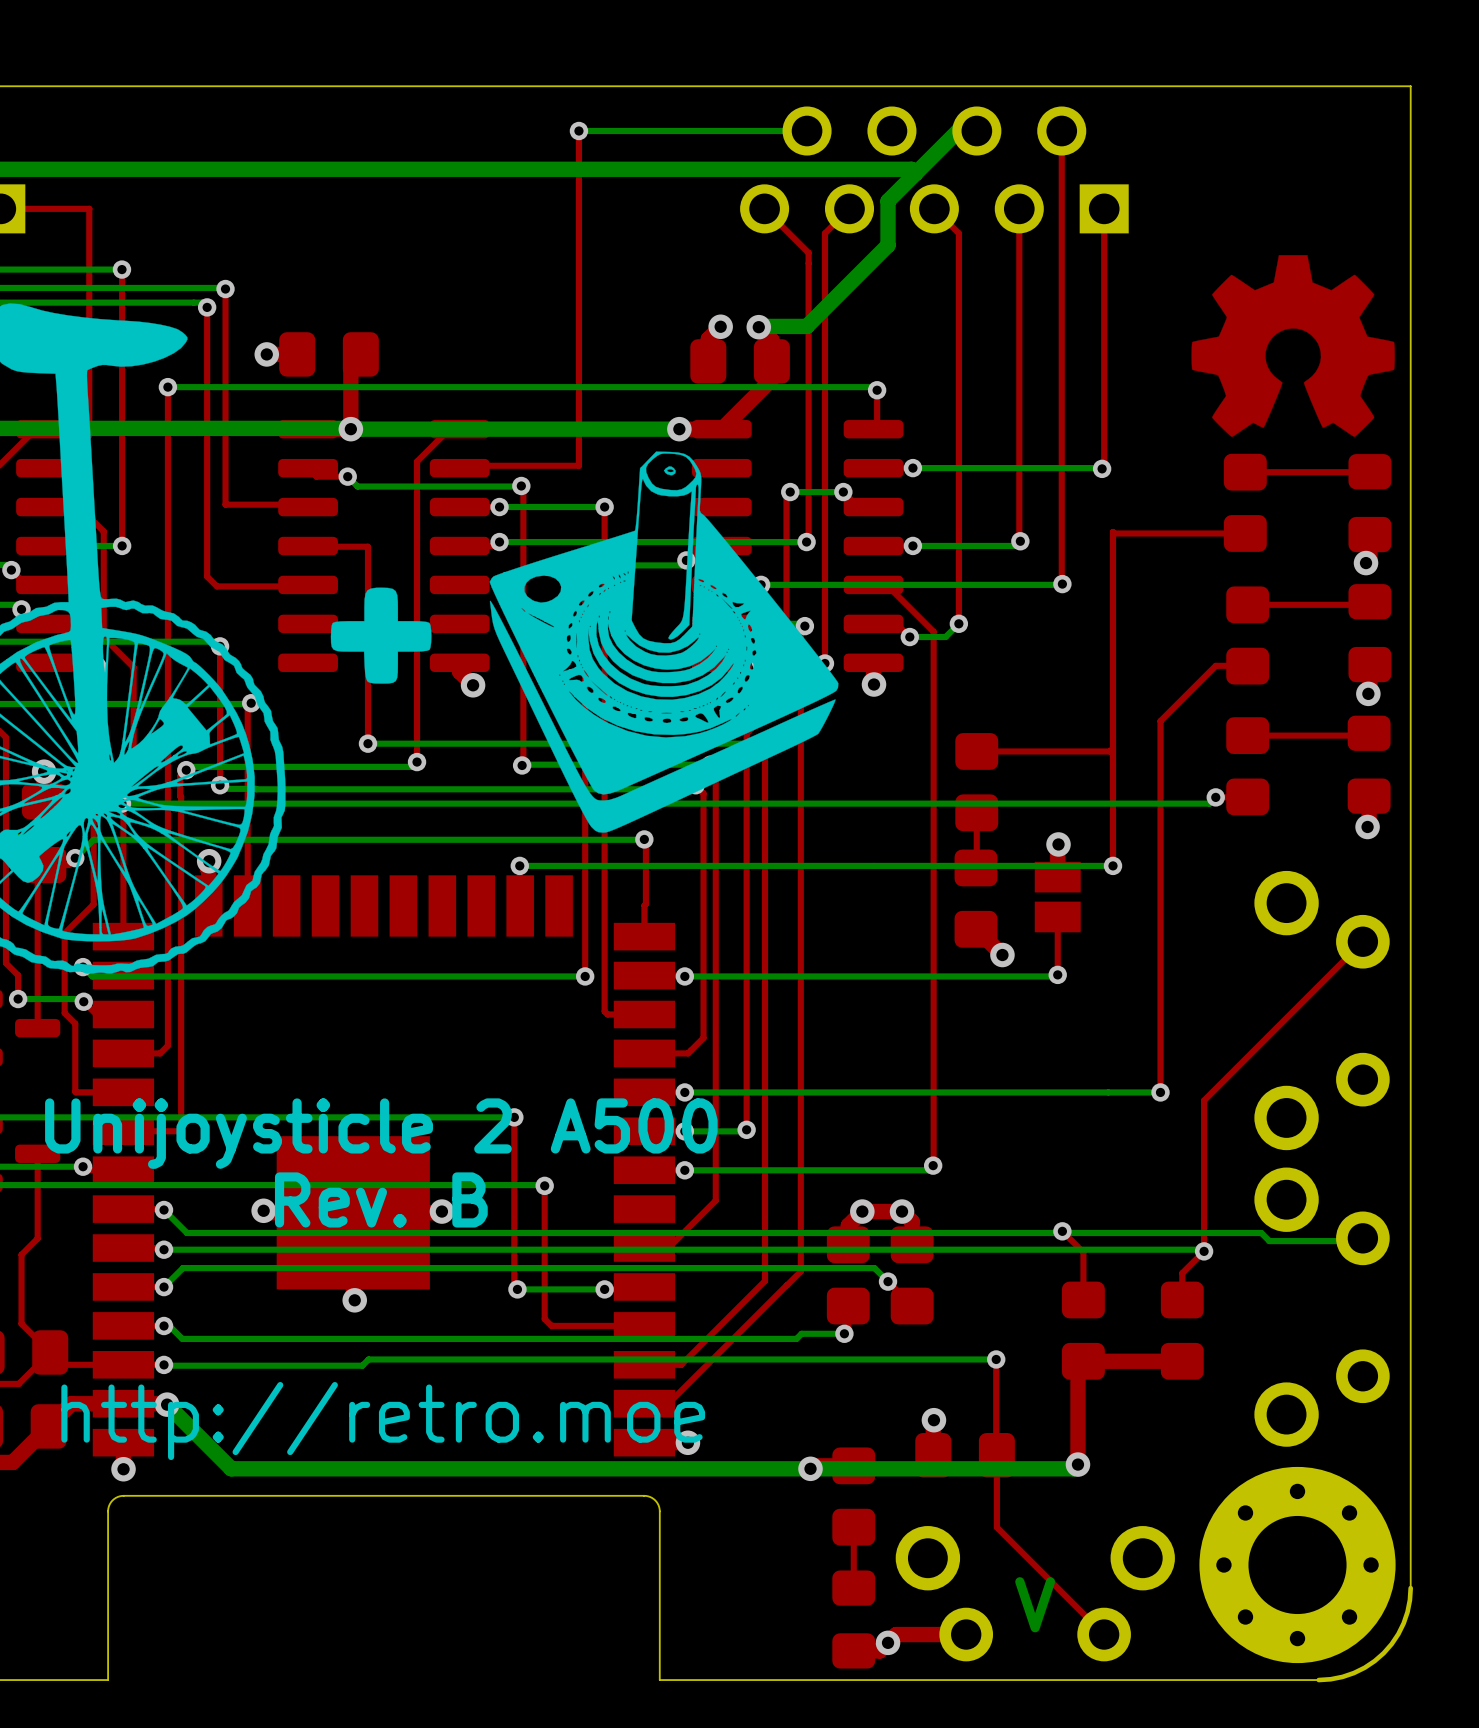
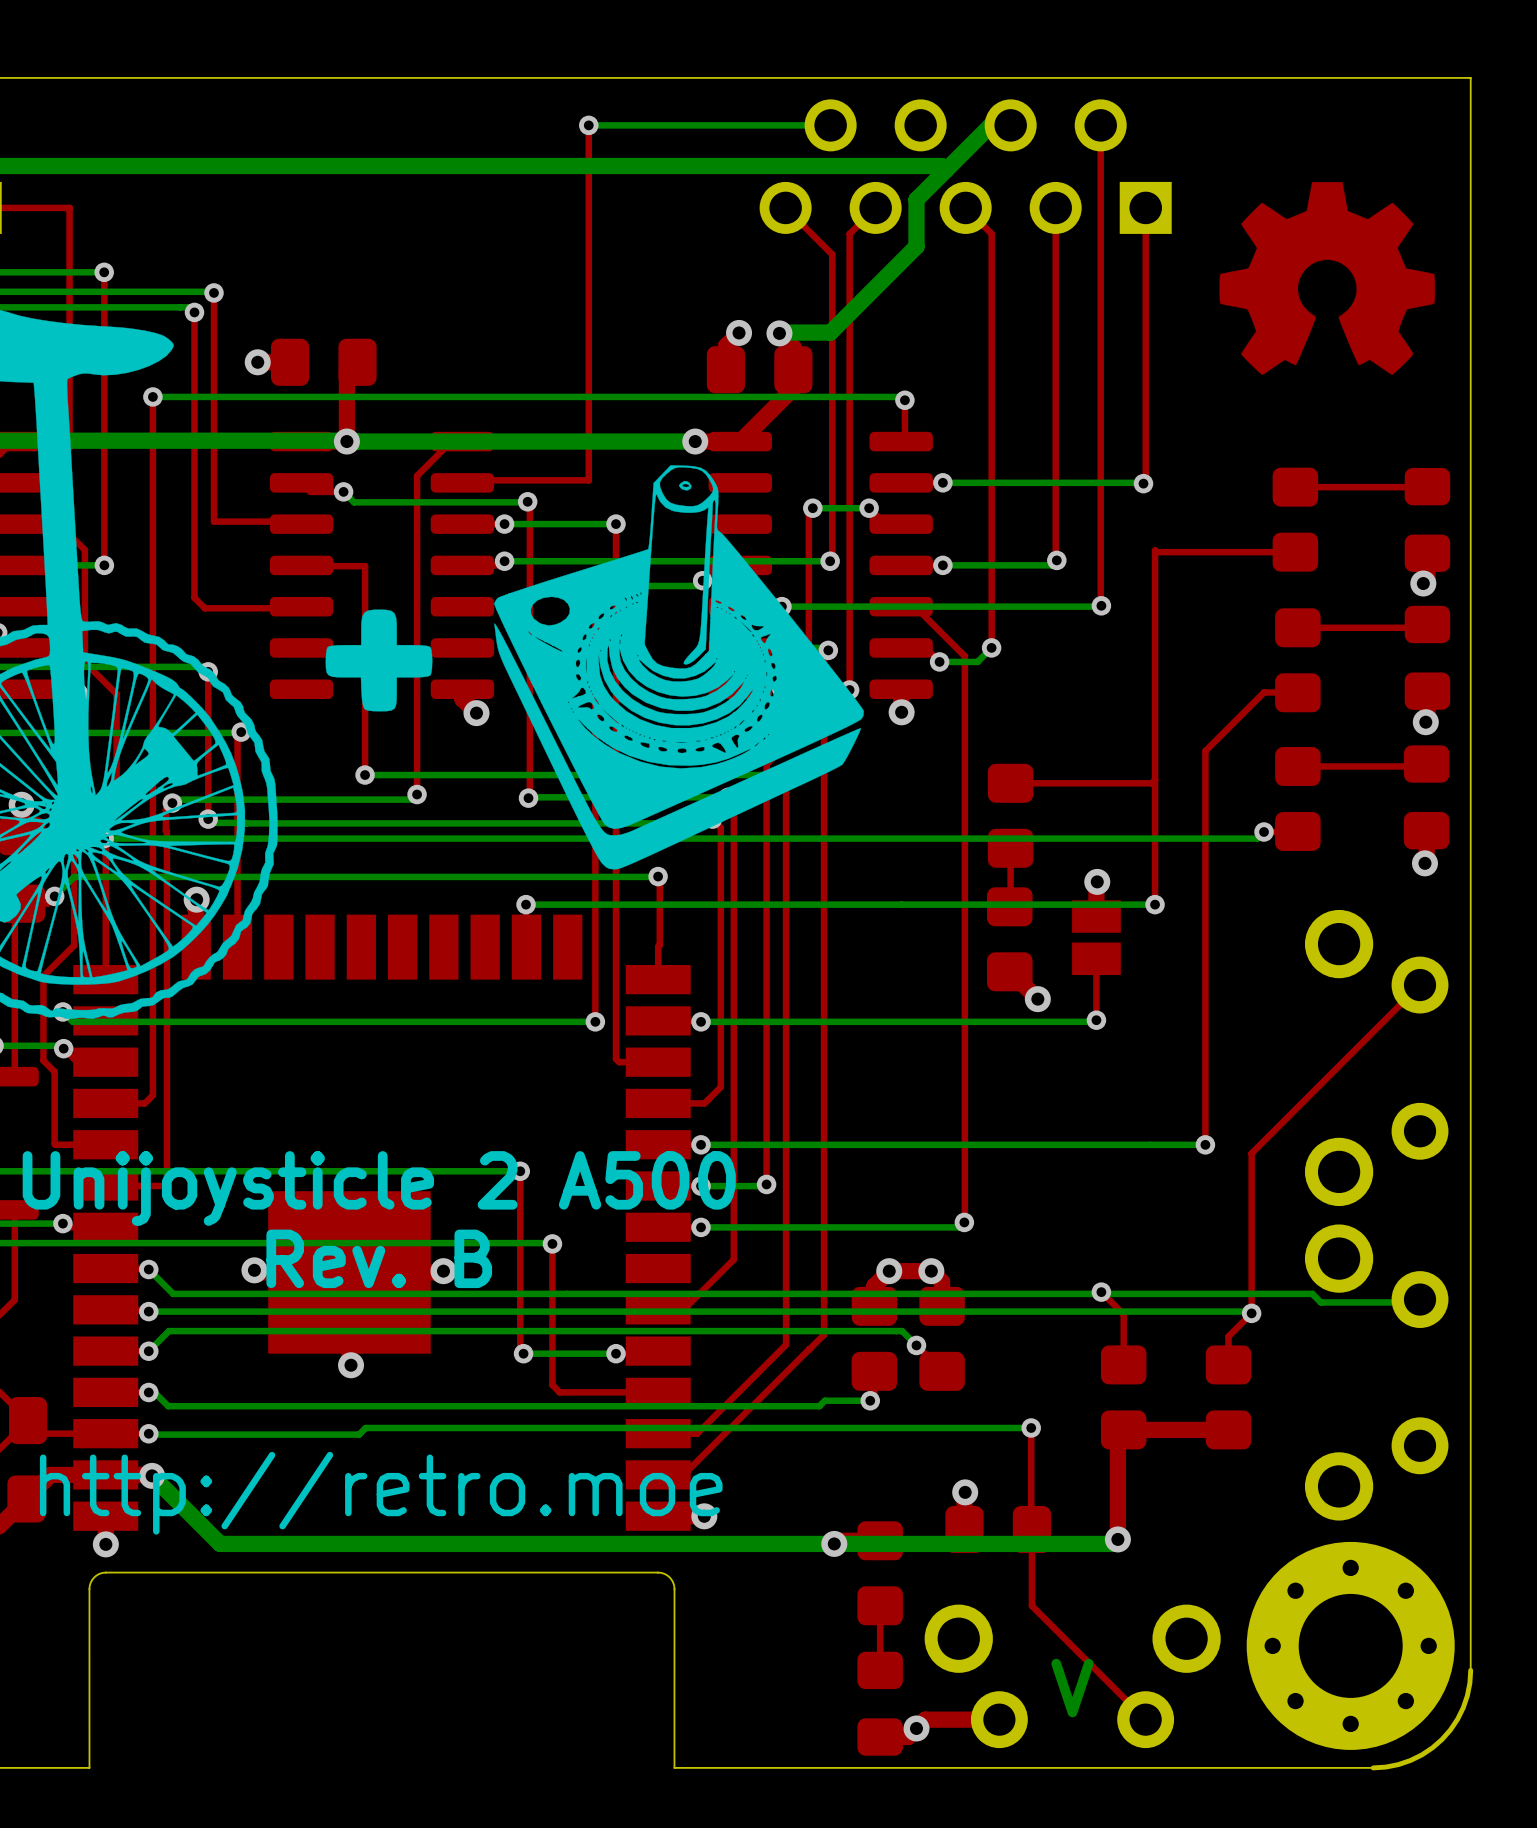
drawing position: (1293, 346) -> (1327, 278)

